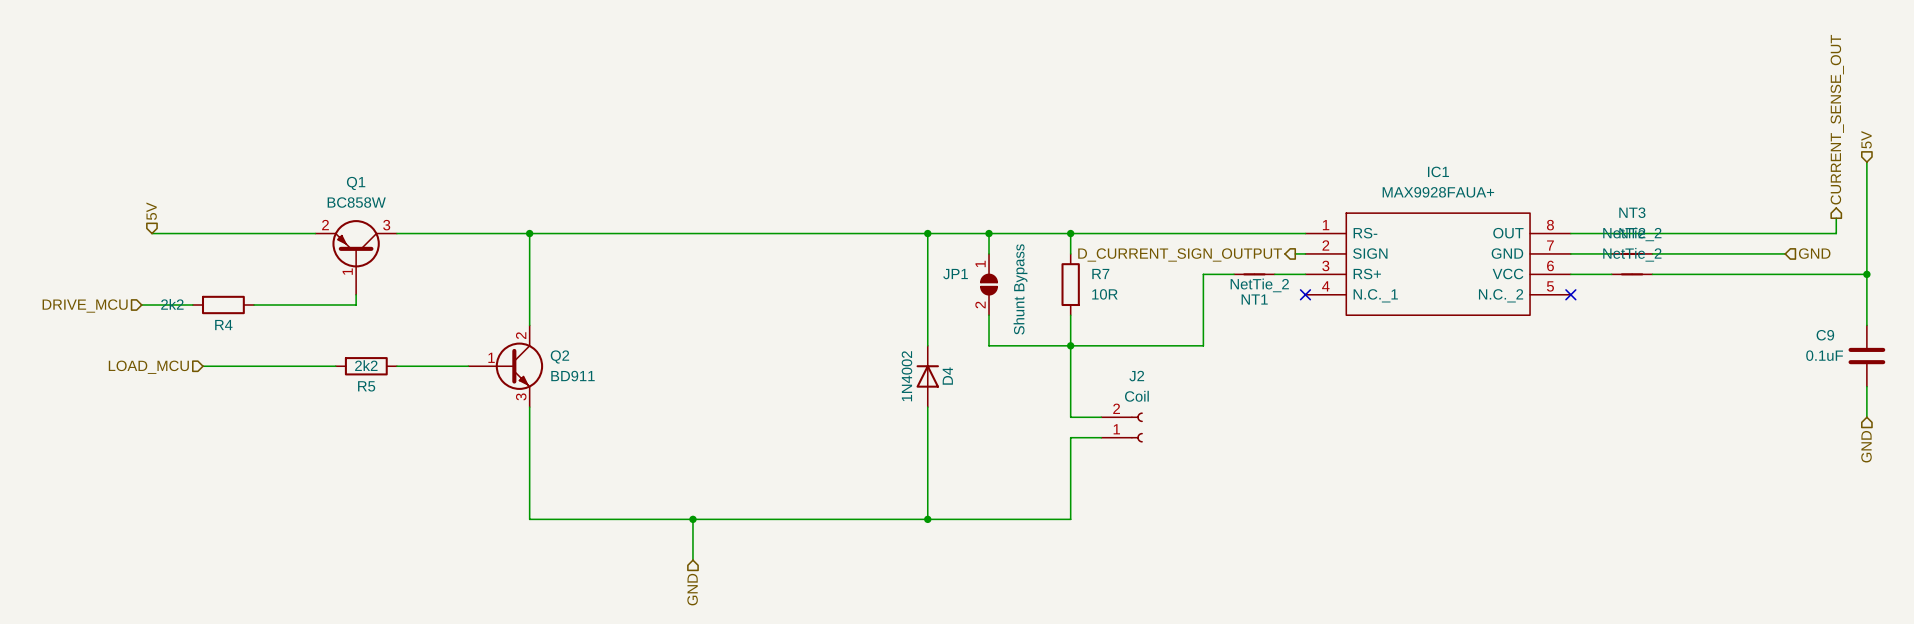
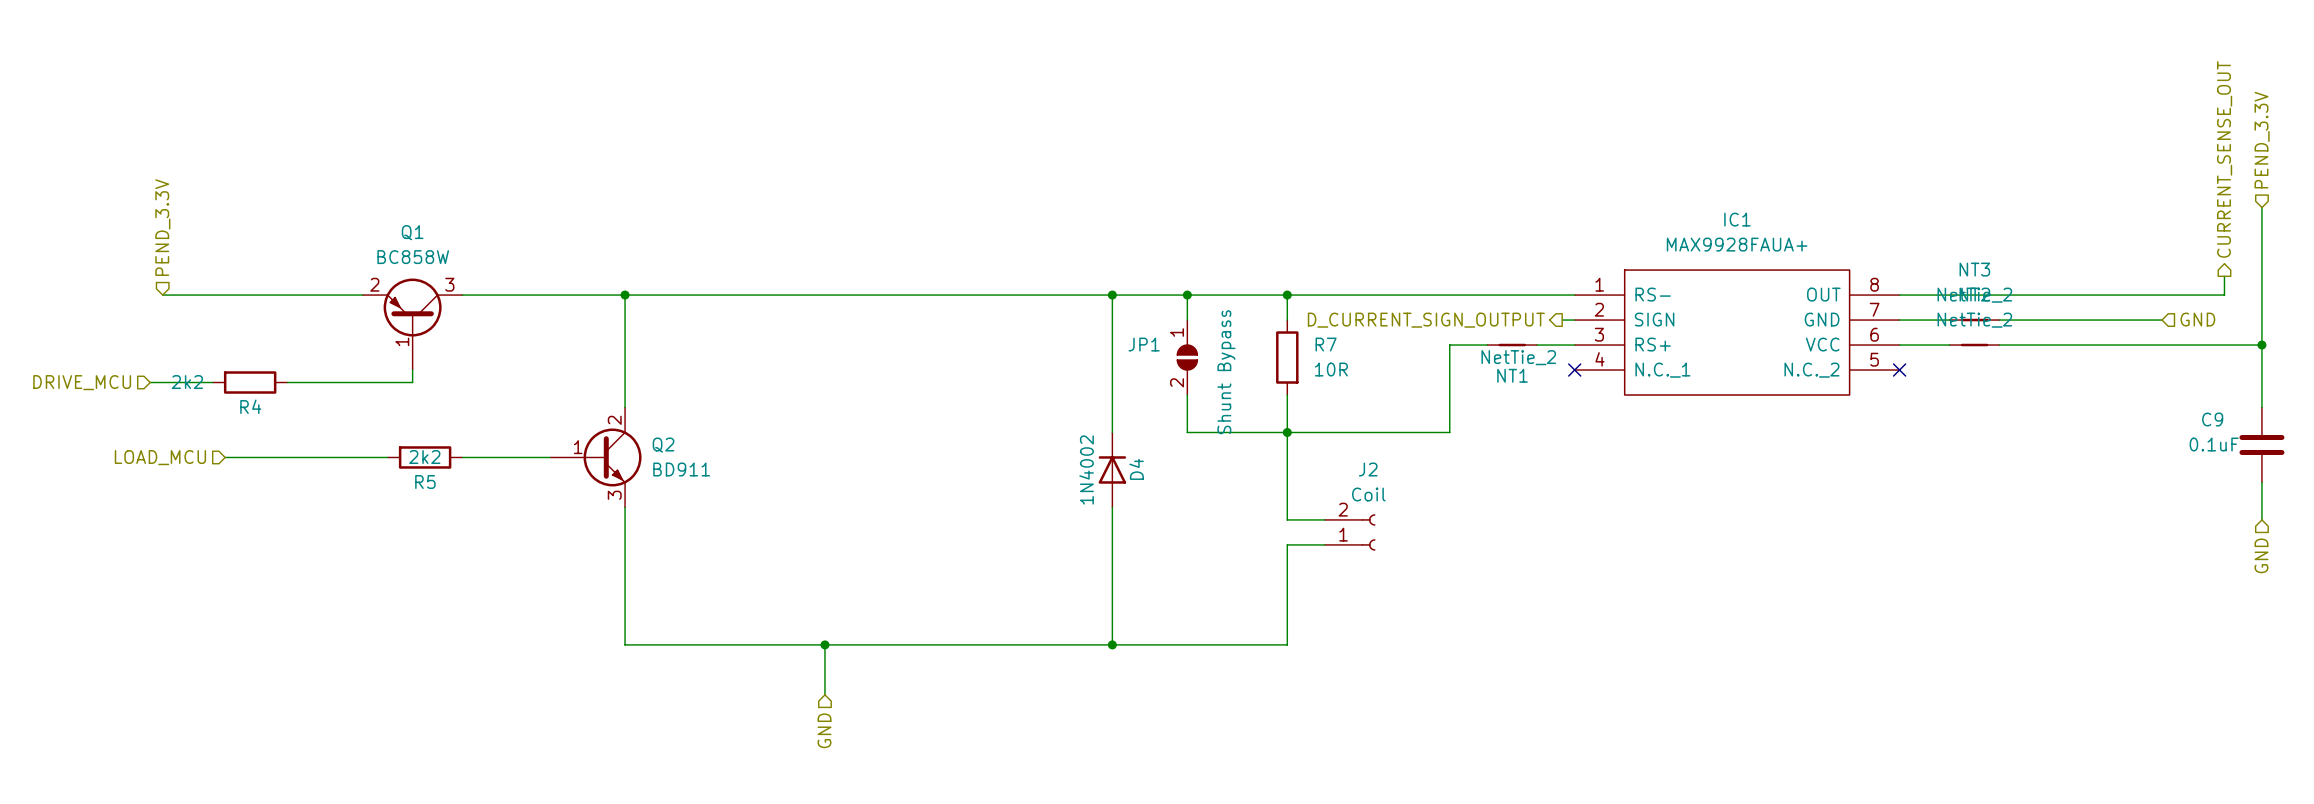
hierarchical label: 5V (1866, 139) -> PEND_3.3V (2262, 140)
hierarchical label: 5V (151, 211) -> PEND_3.3V (162, 227)

